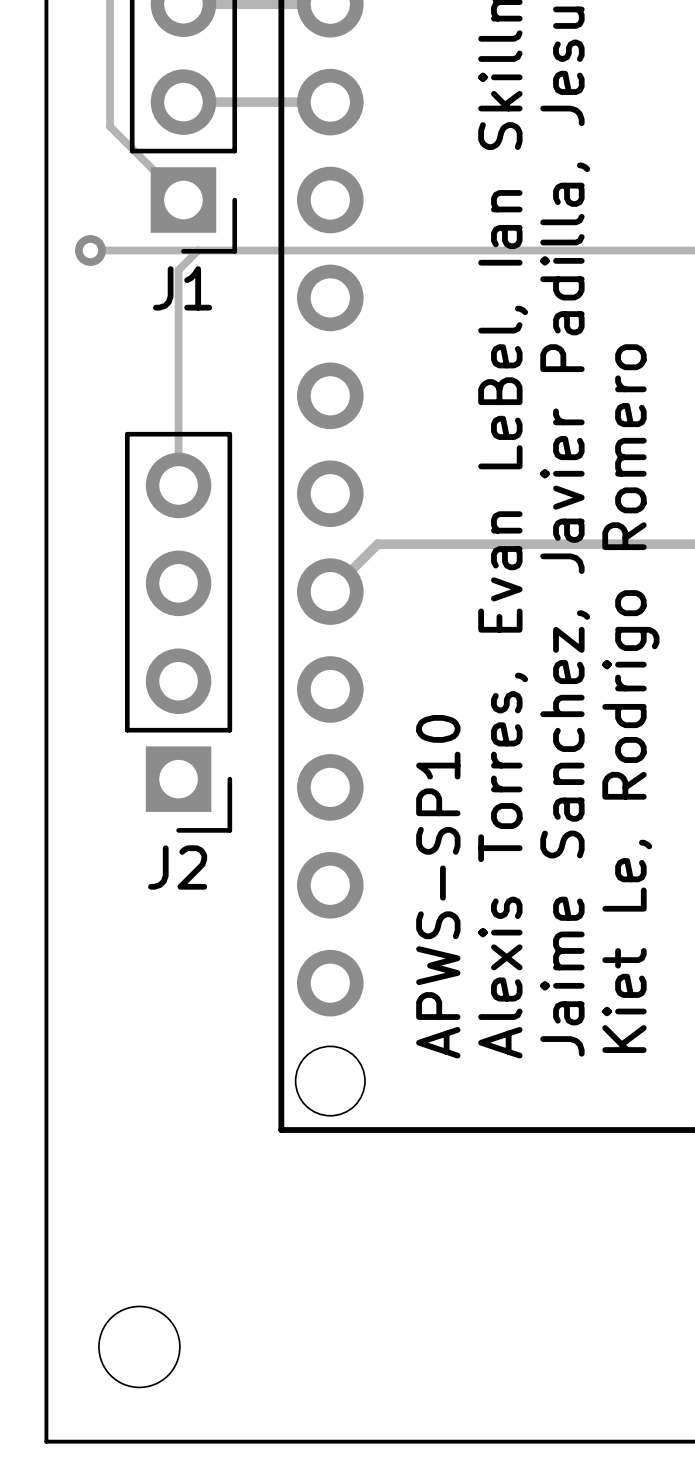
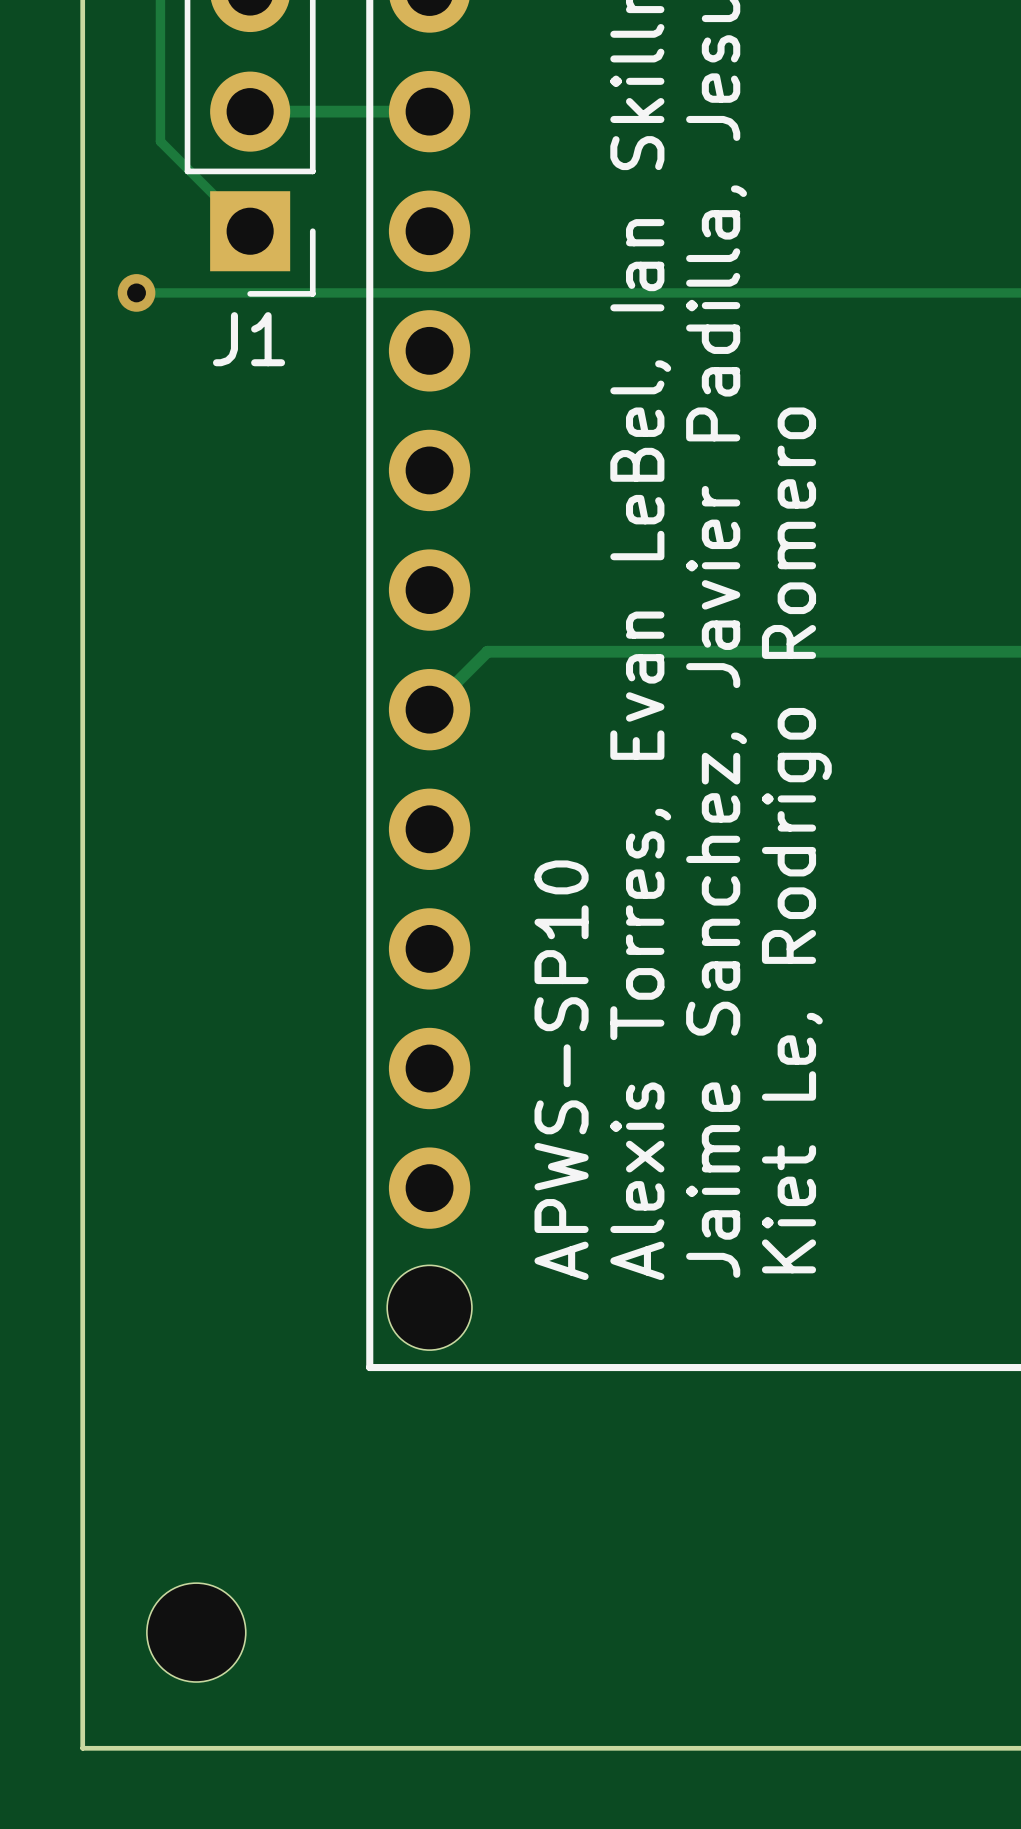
track: (198, 250) (178, 270) (178, 485) -> none
J2: (178, 632) -> none

